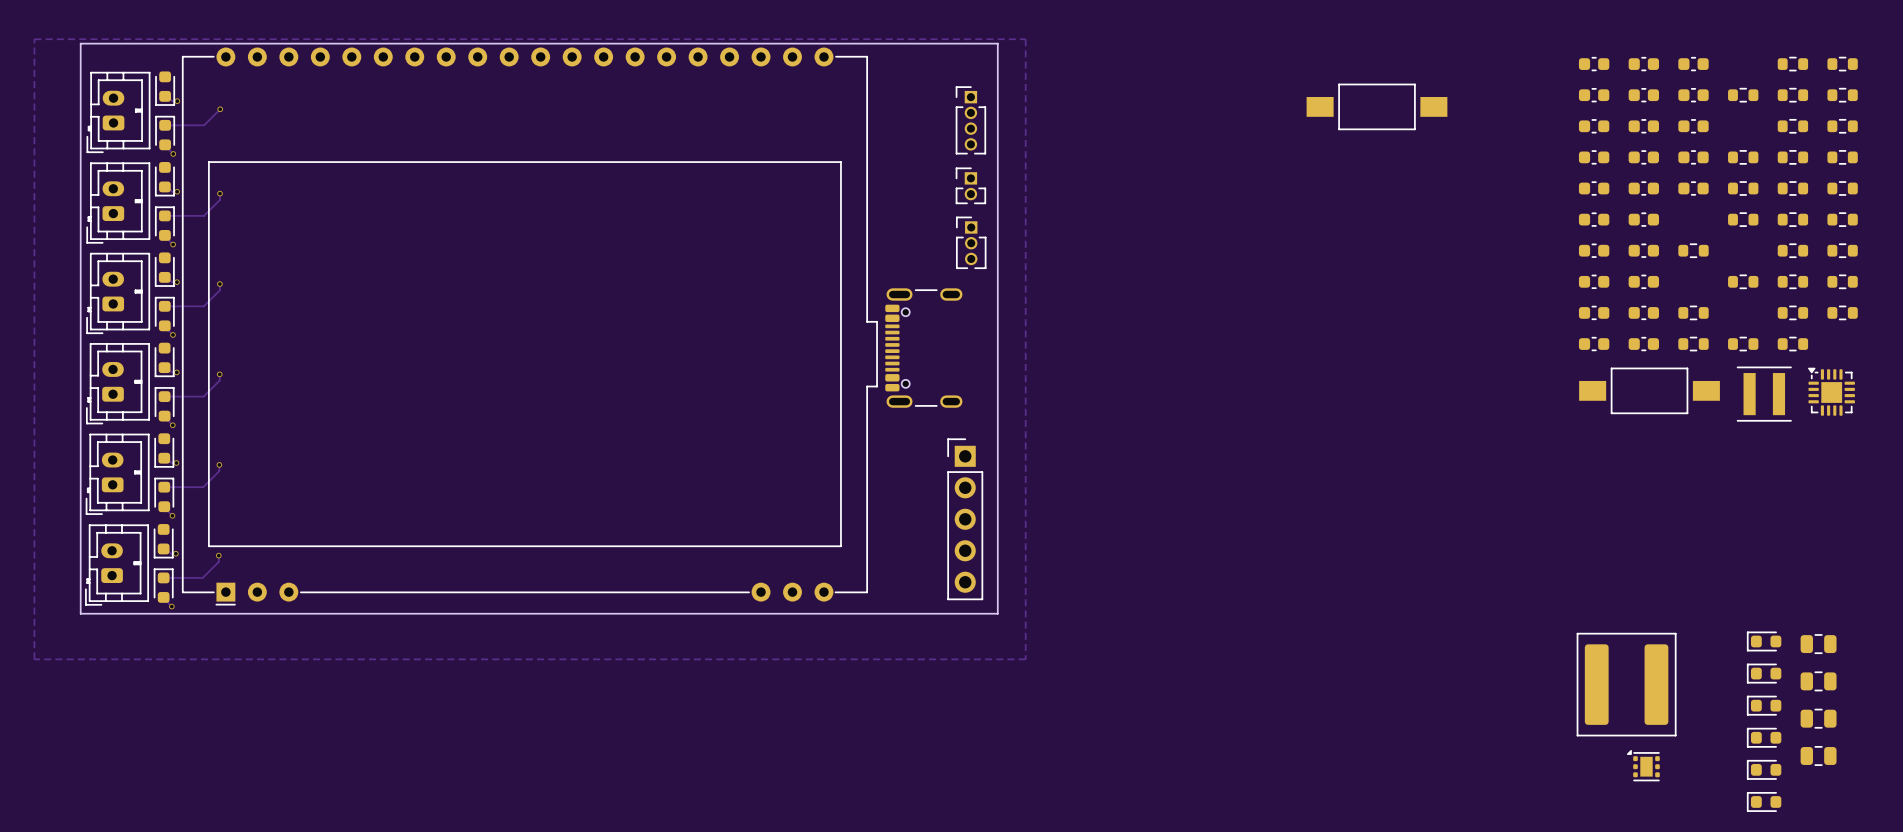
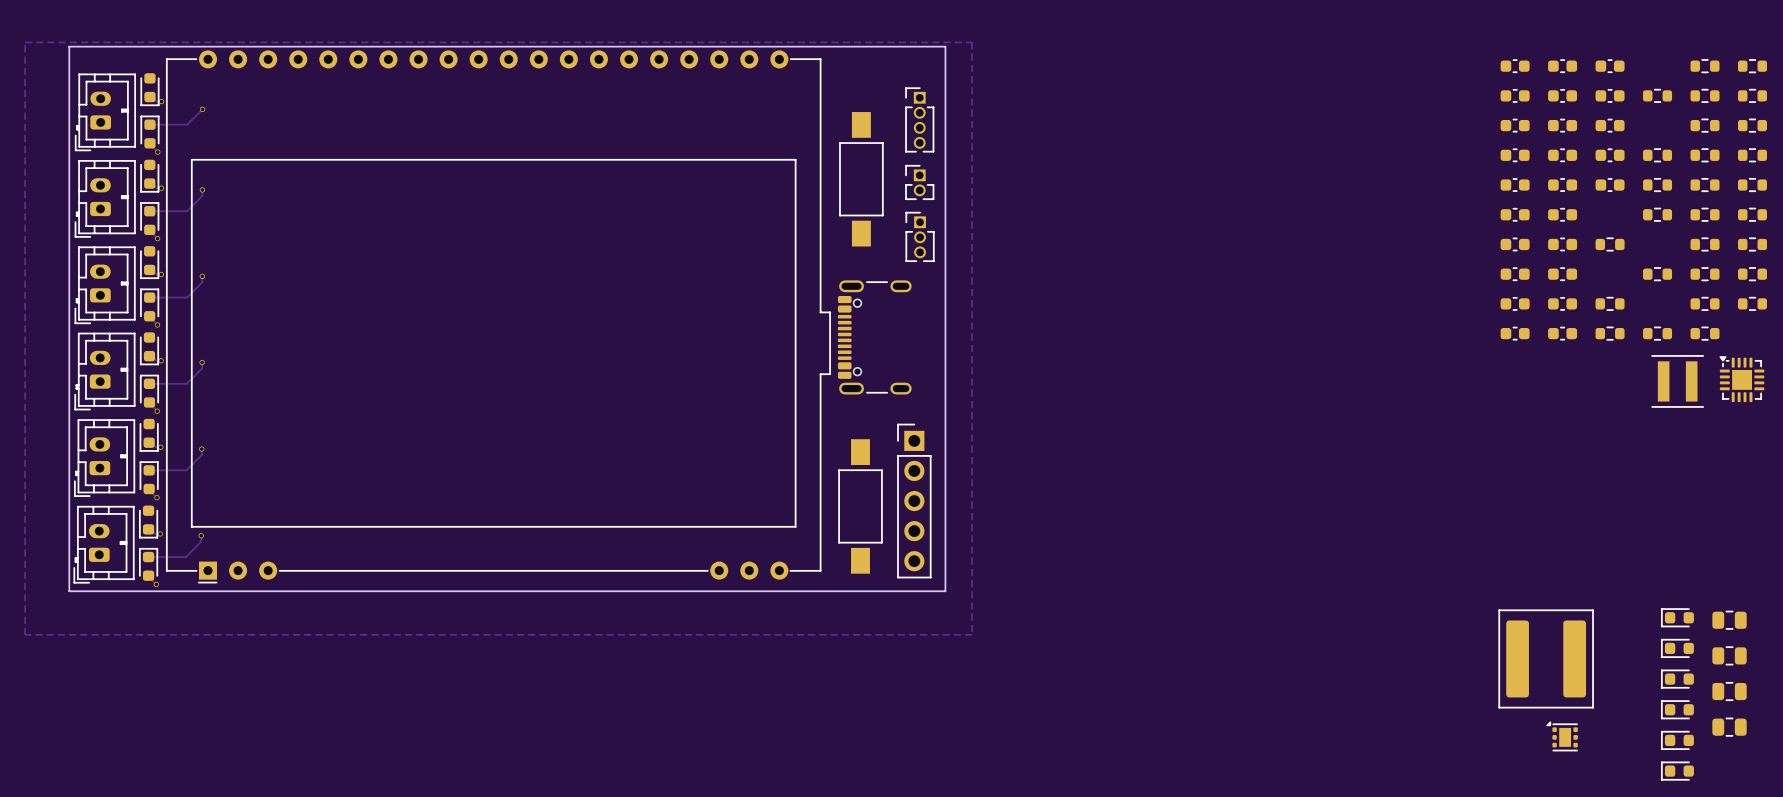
part: (1376, 106) -> none
part: none -> (861, 179)
part: (1649, 390) -> none
part: none -> (860, 506)

